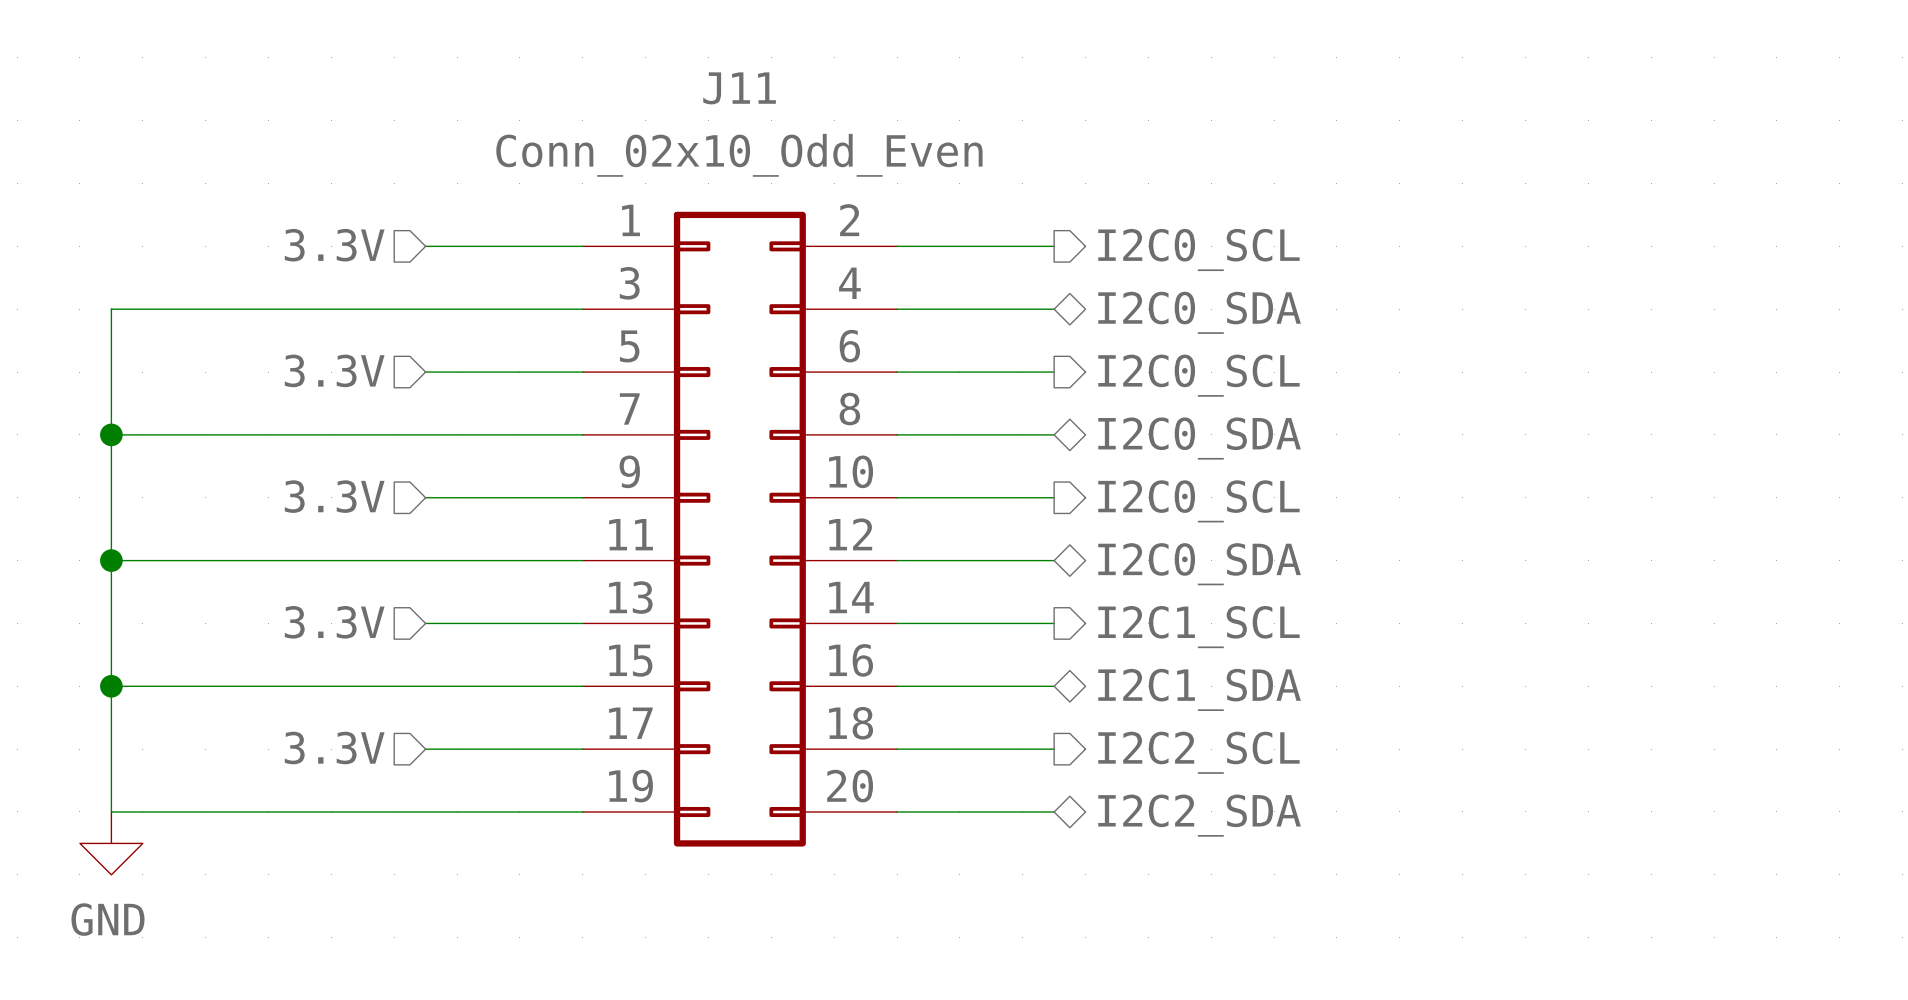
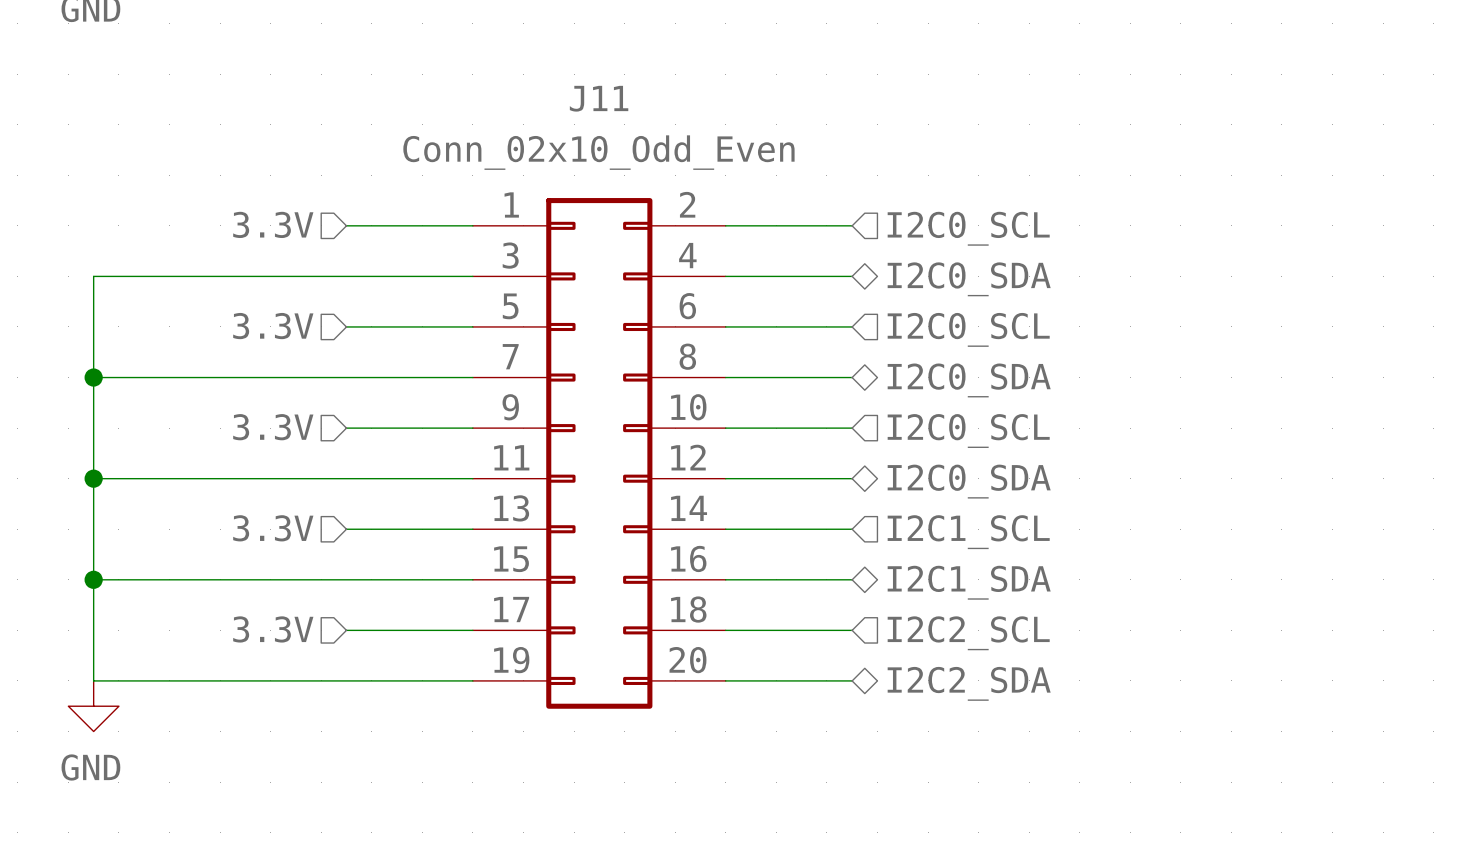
hierarchical label shape: output (1198, 249) -> input (968, 228)
hierarchical label shape: output (1198, 375) -> input (968, 329)
hierarchical label shape: output (1198, 501) -> input (968, 431)
hierarchical label shape: output (1198, 627) -> input (968, 532)
hierarchical label shape: output (1198, 752) -> input (968, 633)

